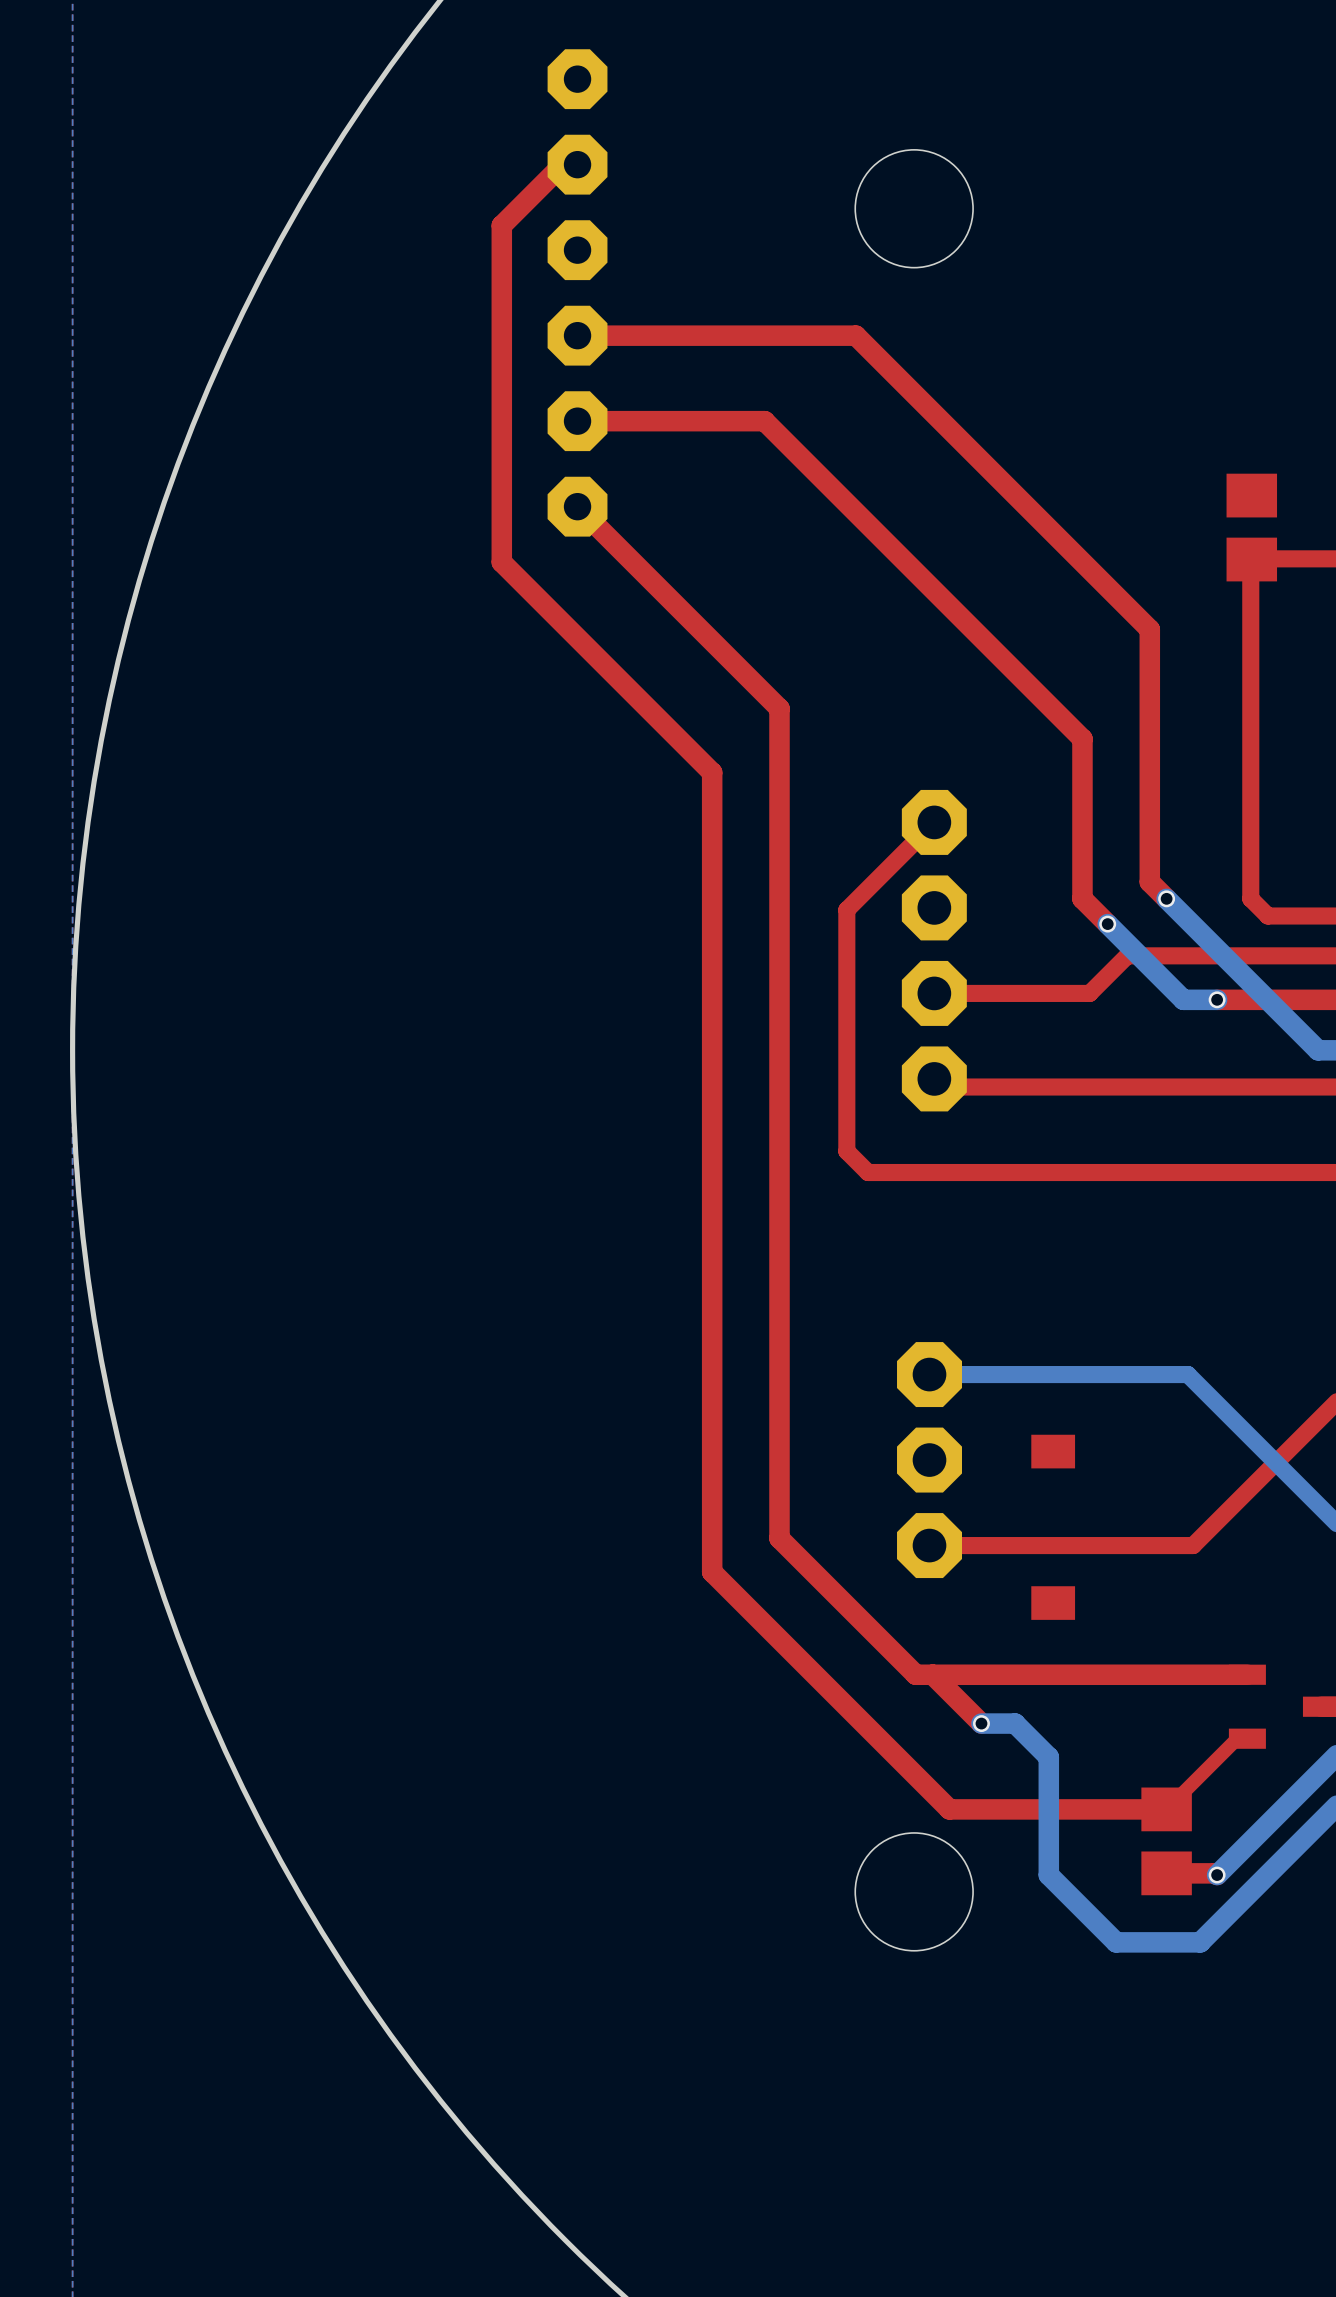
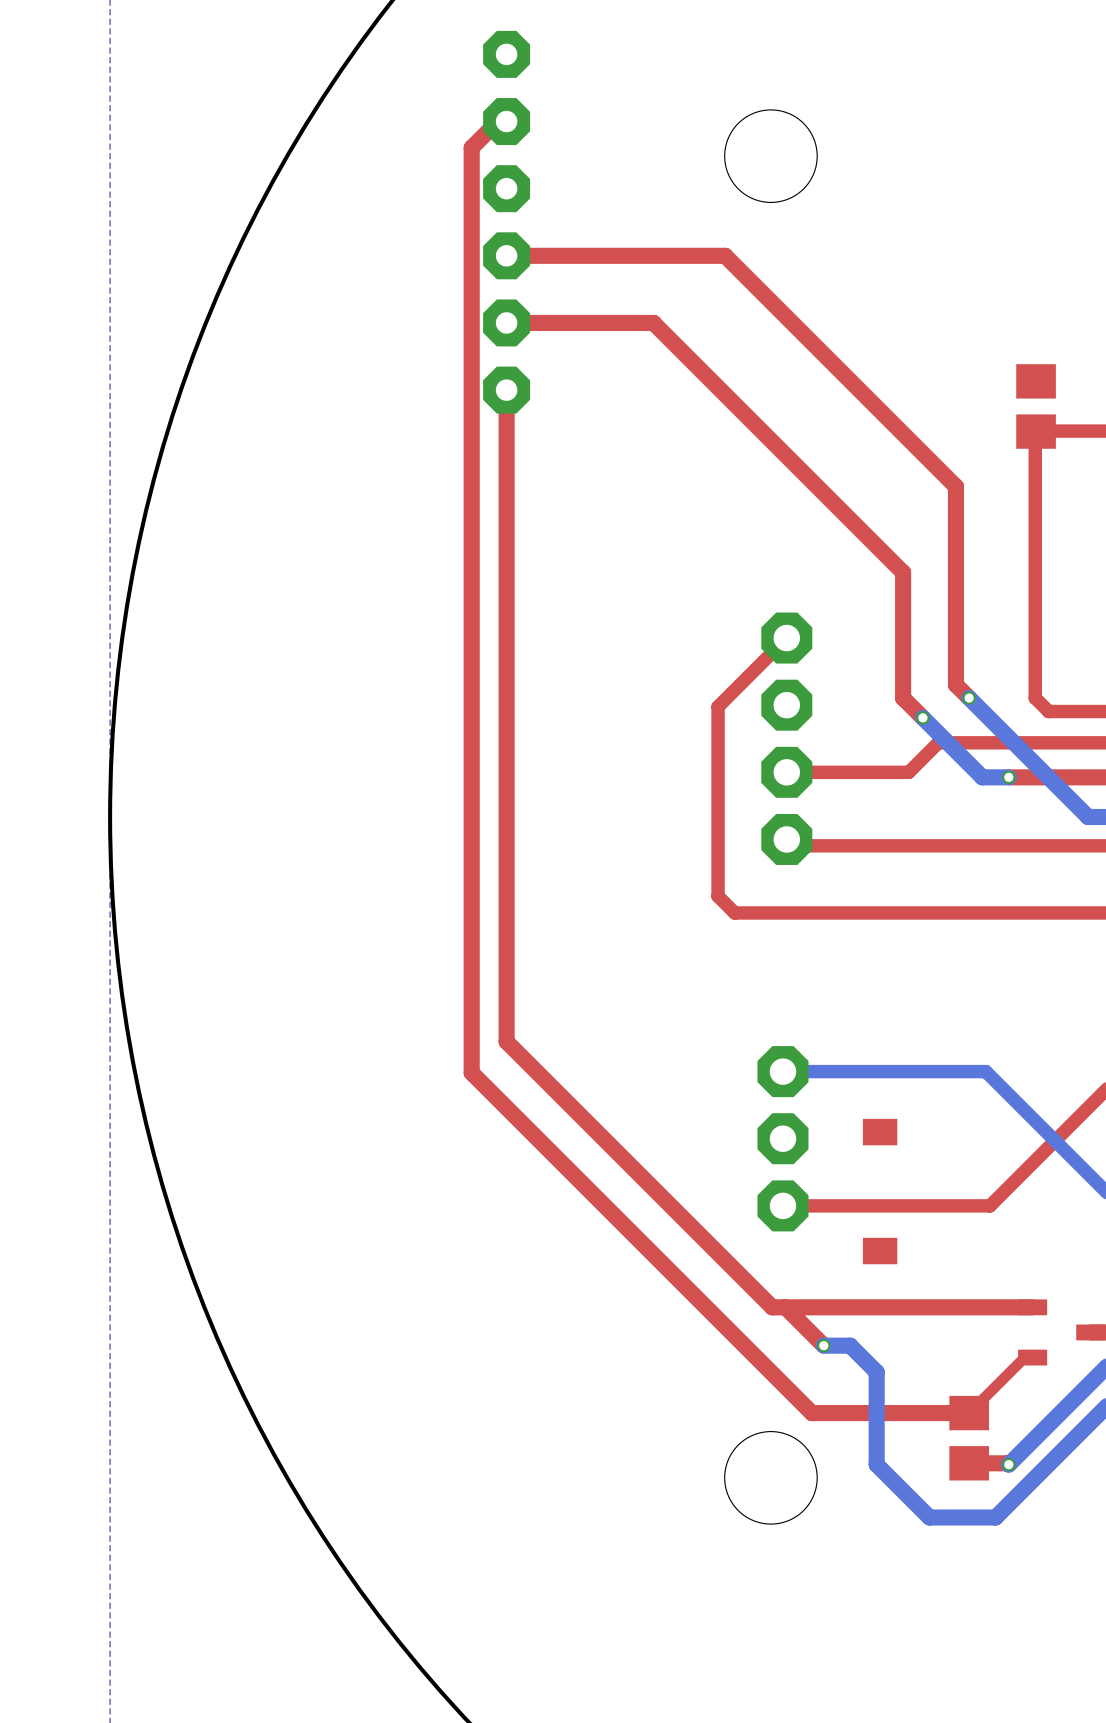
top track: (566, 164) (562, 164) (501, 225) (501, 562) (712, 772) (712, 1572) (949, 1809) (966, 1809) -> (497, 121) (471, 147) (471, 1072) (811, 1413)
top track: (577, 506) (779, 708) (779, 1538) -> (506, 390) (506, 1041) (665, 1200)

